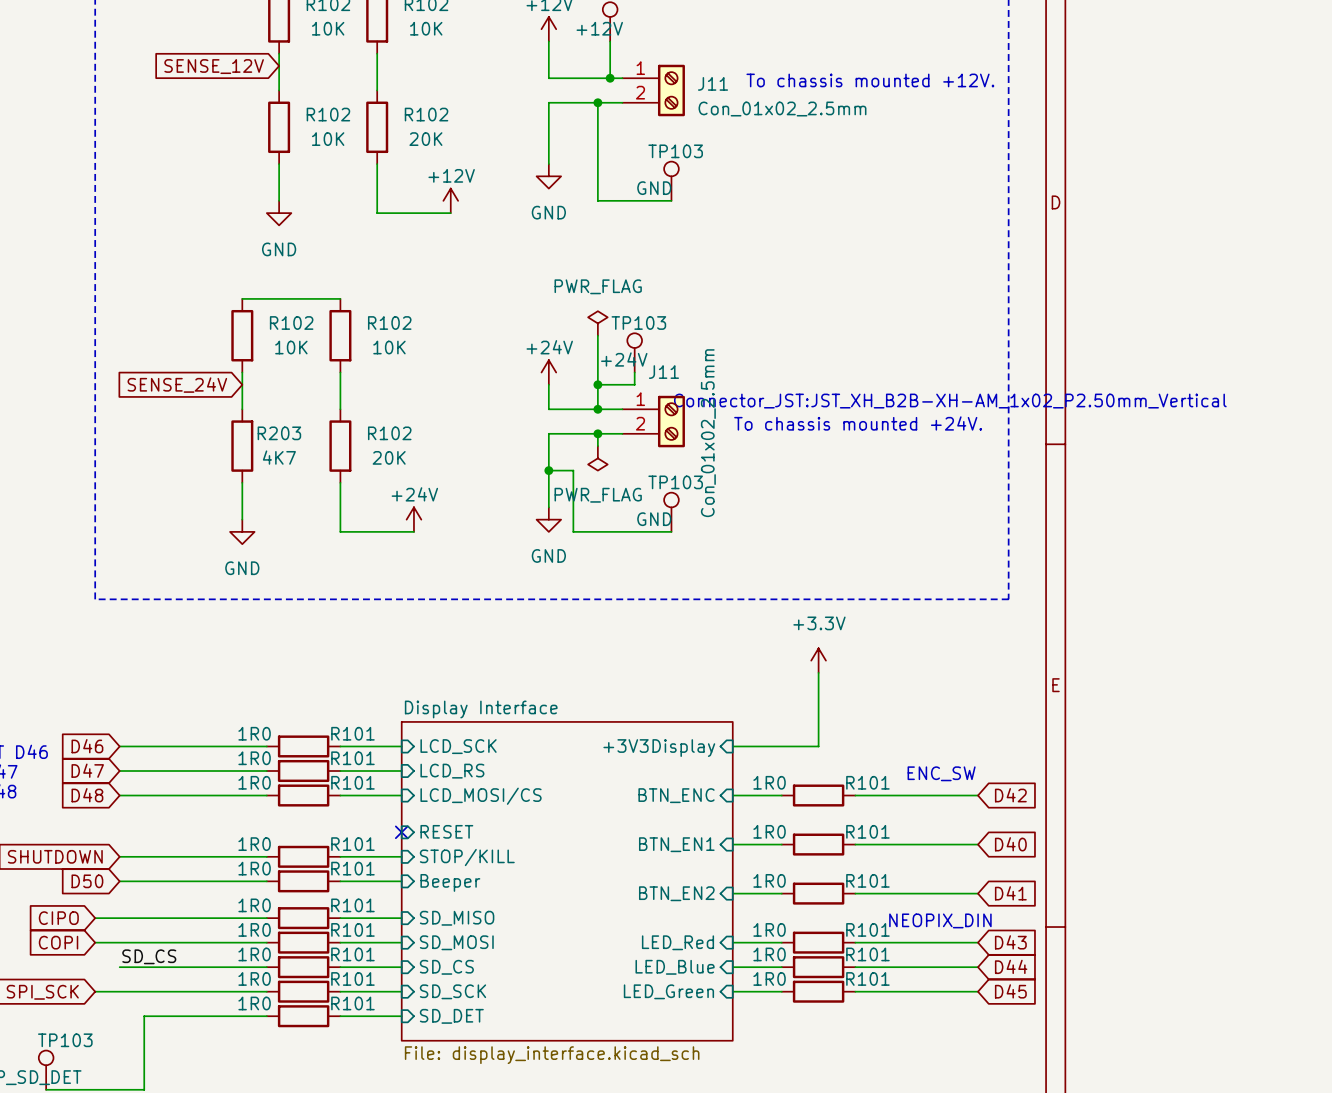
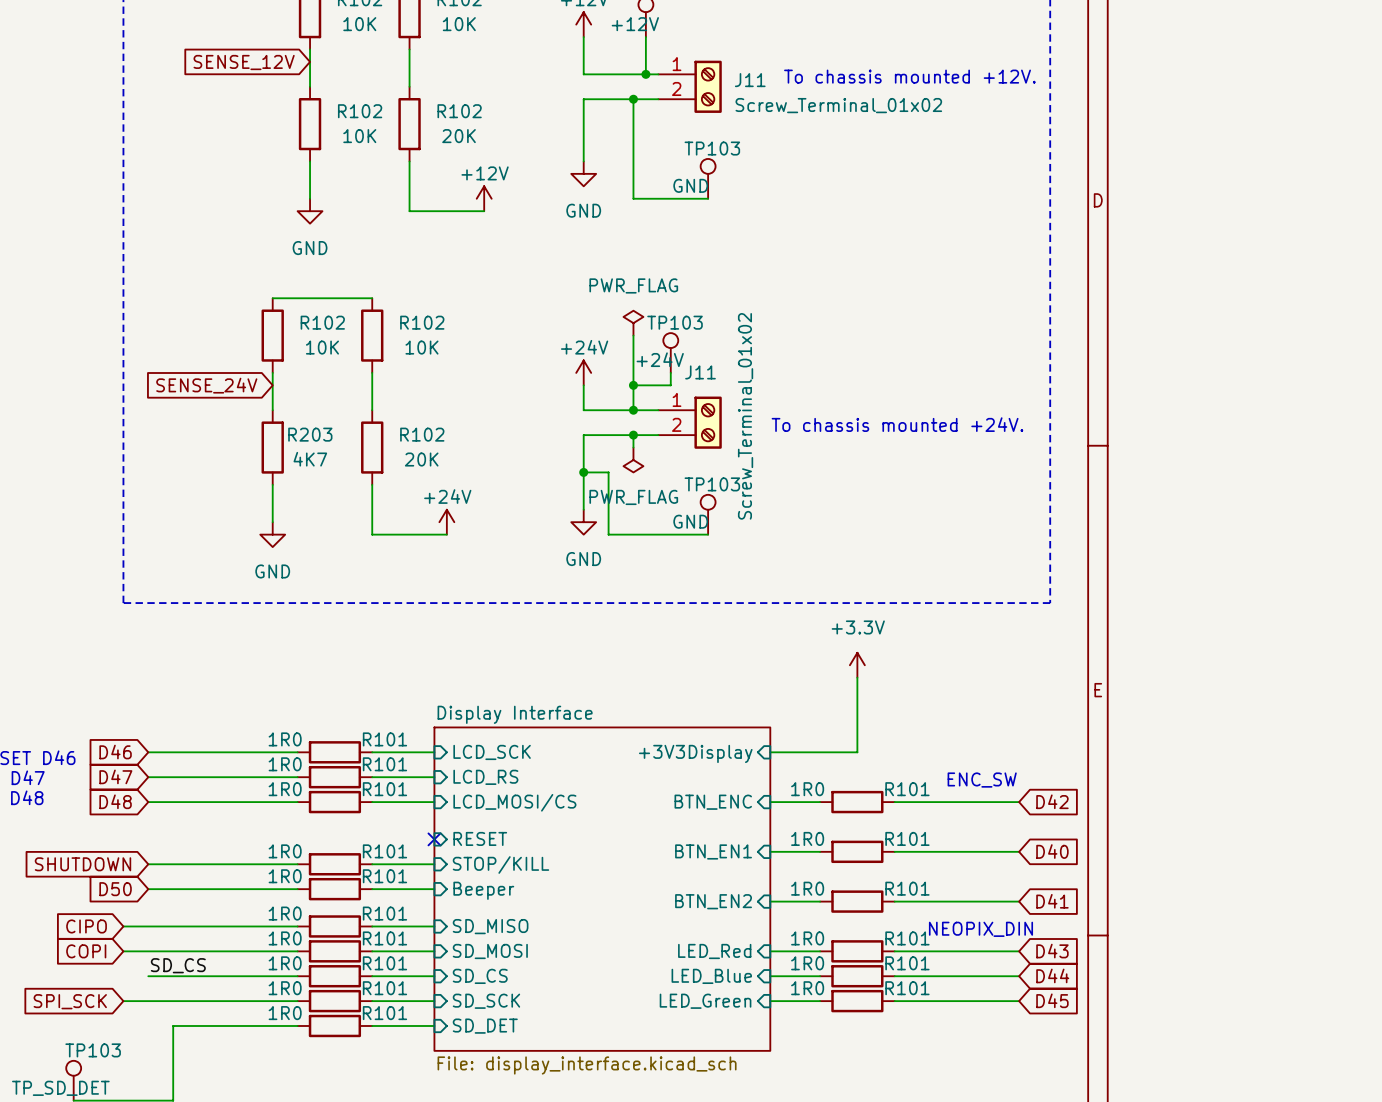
J11 value: Con_01x02_2.5mm (782, 109) -> Screw_Terminal_01x02 (838, 105)
text: Connector_JST:JST_XH_B2B-XH-AM_1x02_P2.50mm_Vertical (950, 401) -> none
J11 value: Con_01x02_2.5mm (708, 433) -> Screw_Terminal_01x02 (745, 416)

